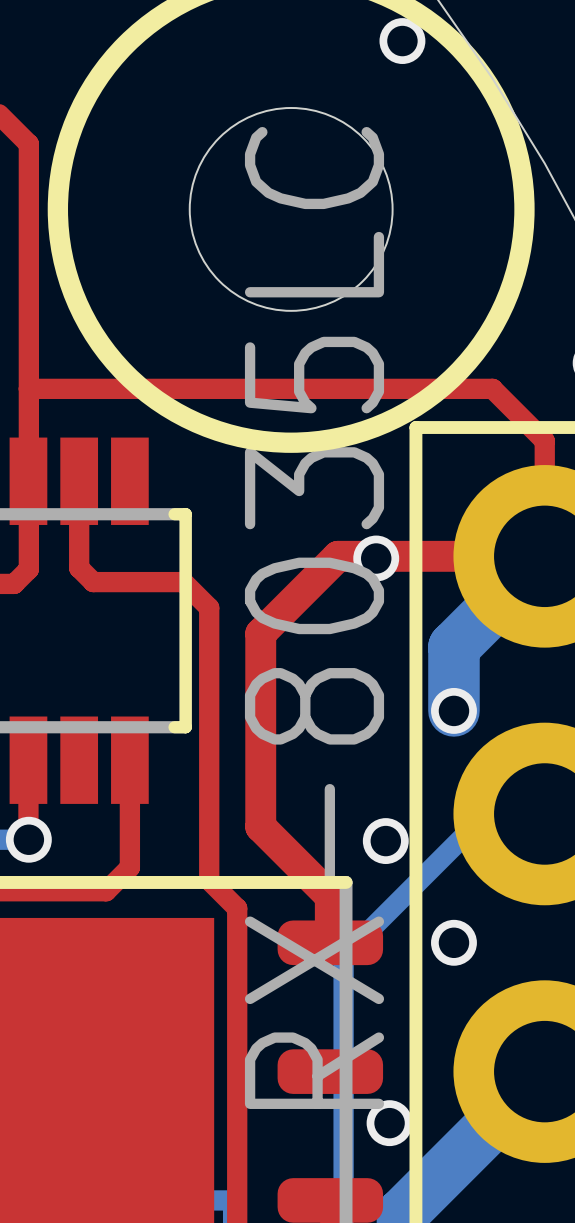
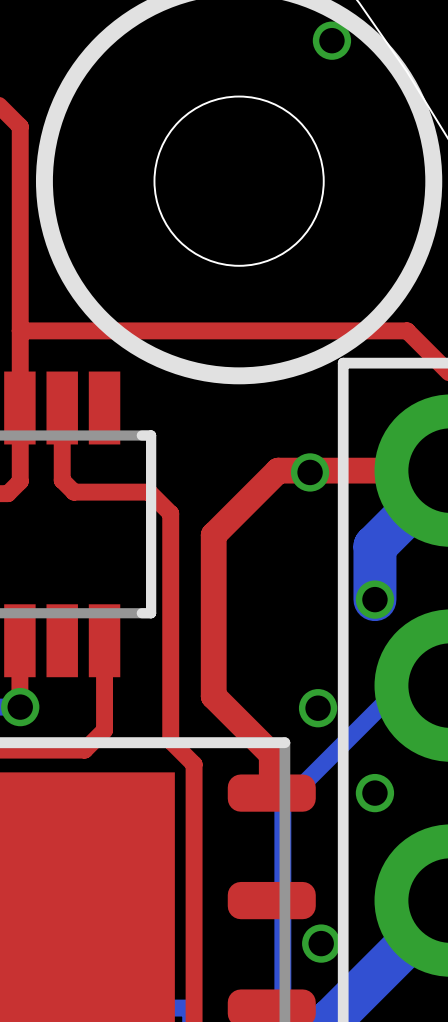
part value: RX-8035LC (314, 617) -> none

